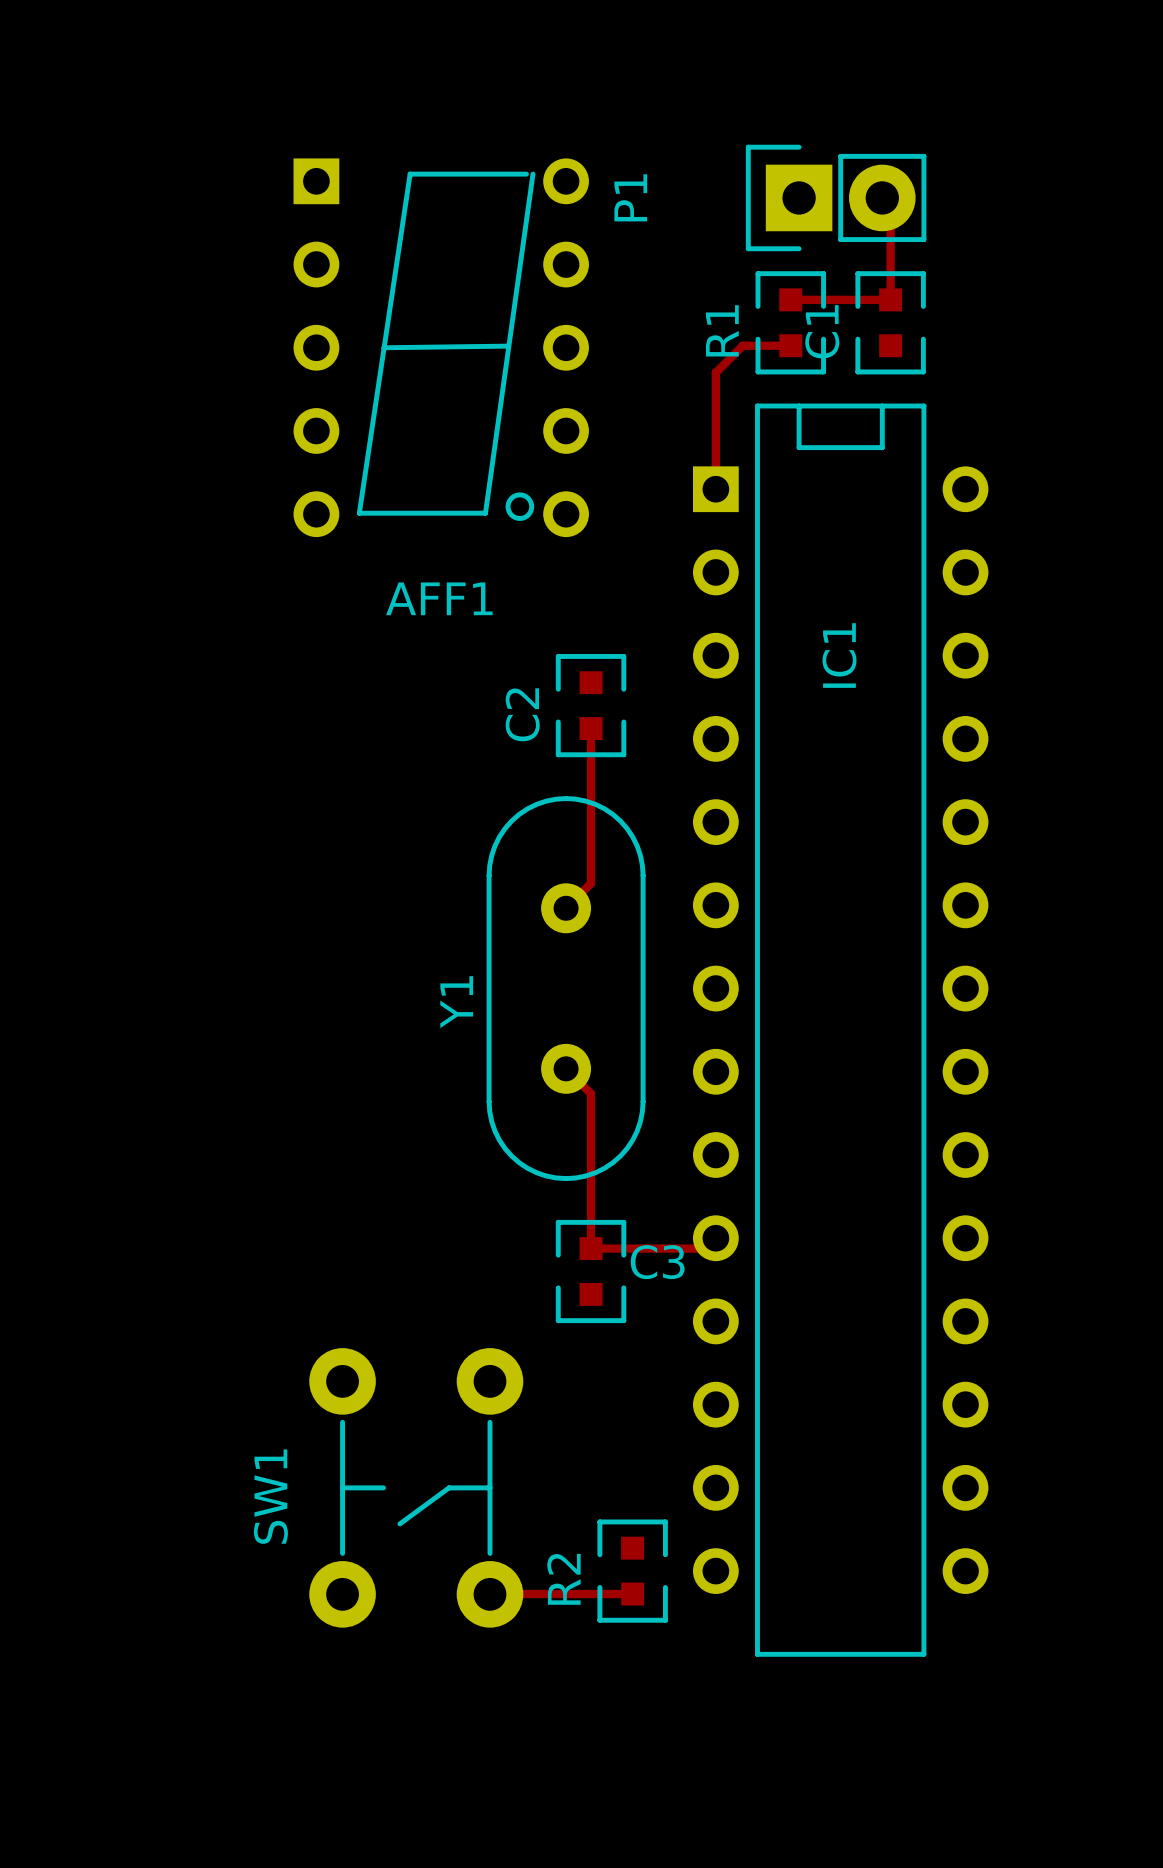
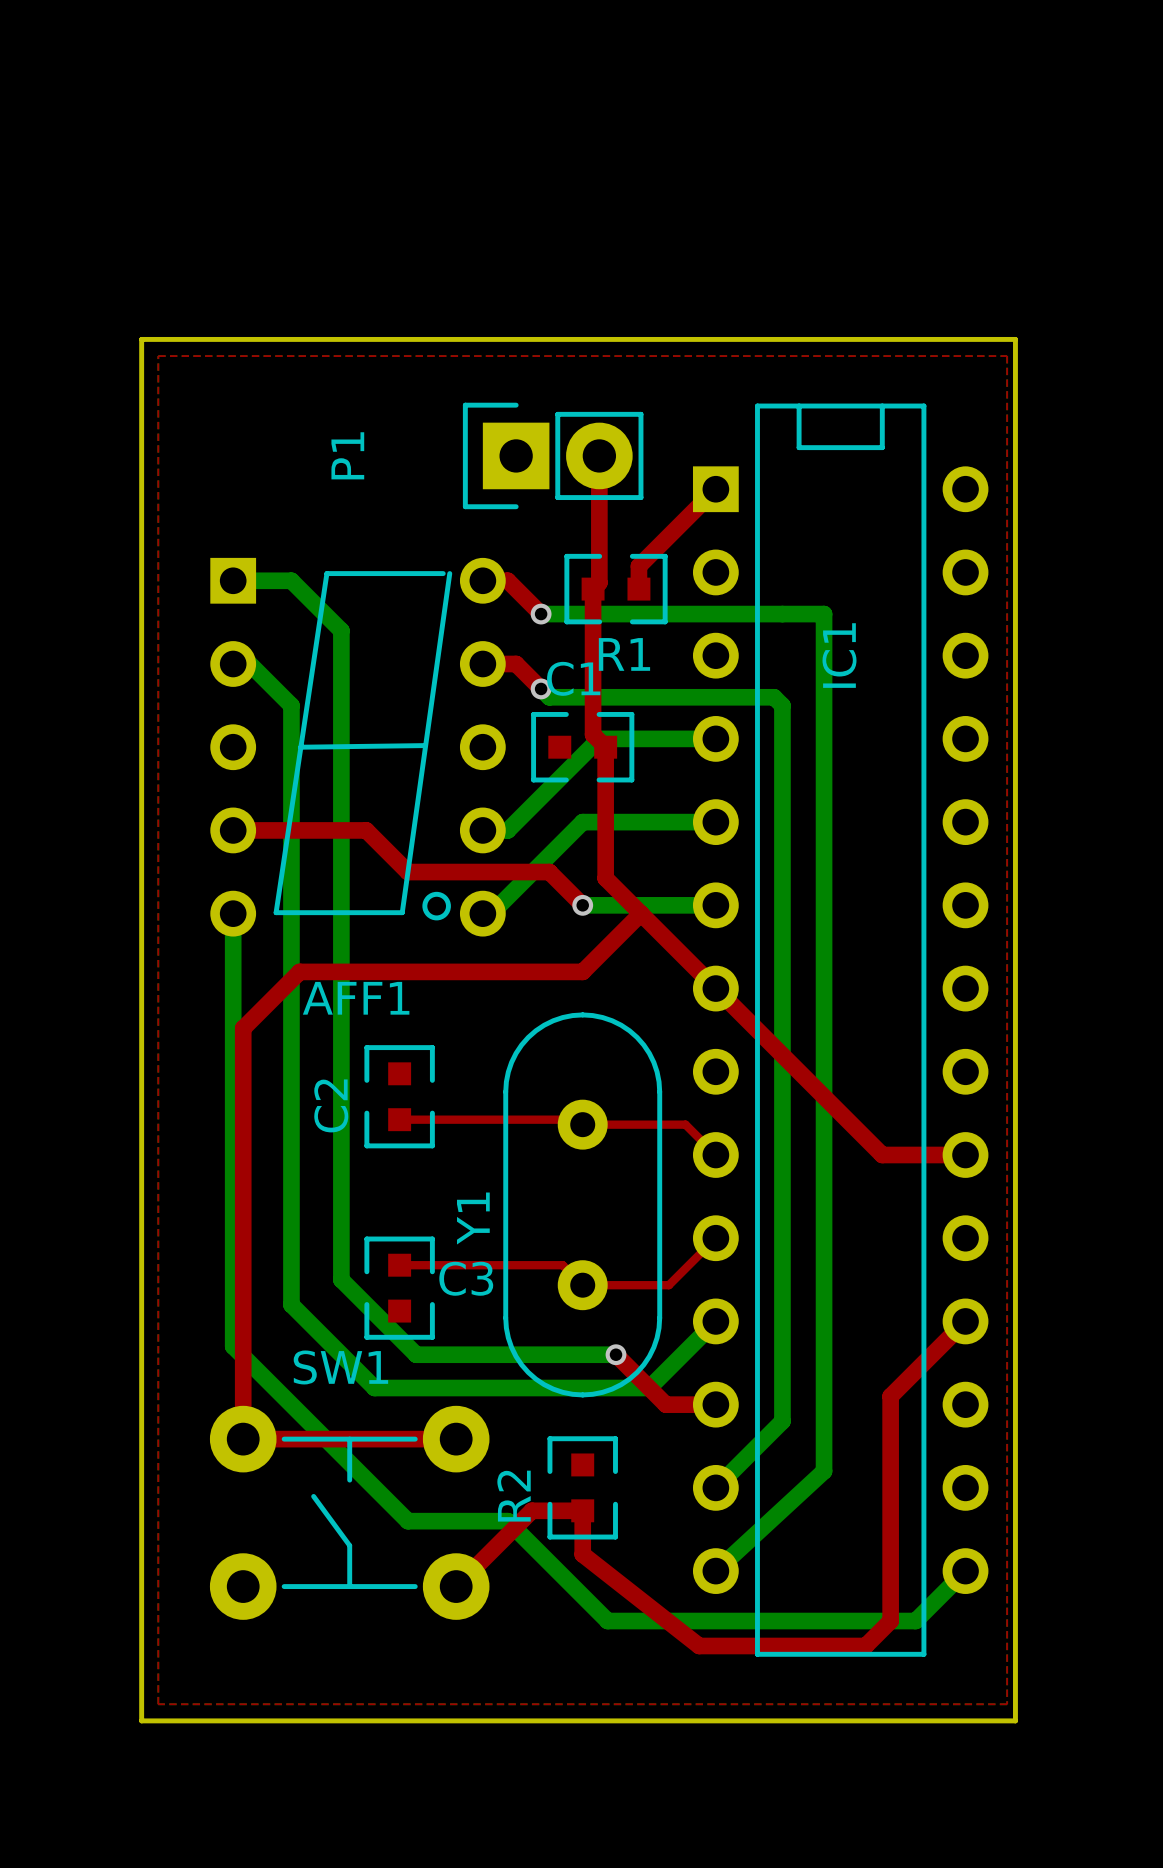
P1 position: (836, 197) -> (553, 455)
top track: (882, 197) (890, 206) (890, 299) (790, 299) -> none
R1 rotation: 0° (790, 322) -> 90° clockwise (616, 589)
R1 position: (790, 322) -> (616, 589)
C1 rotation: 0° (890, 322) -> 90° clockwise (582, 747)
C1 position: (890, 322) -> (582, 747)
R1 name position: R1 (722, 330) -> R1 (624, 654)
board edge: none -> (141, 339) (1015, 339) (1015, 1720) (141, 1720) (141, 339)
top track: (790, 345) (742, 345) (715, 372) (715, 489) -> (638, 589) (638, 566) (715, 489)
AFF1 position: (441, 347) -> (358, 747)
top zone outline: none -> (158, 356) (158, 1704) (1007, 1704) (1007, 356) (158, 356)
top track: none -> (599, 455) (599, 582)
bottom track: none -> (233, 580) (291, 580) (341, 630) (341, 1279) (416, 1354) (616, 1354)
top track: none -> (482, 580) (507, 580) (541, 614)
top track: none -> (593, 589) (593, 734) (605, 747) (605, 878) (882, 1154) (965, 1154)
bottom track: none -> (541, 614) (824, 614) (824, 1471) (715, 1571)
via: none -> (541, 614)
bottom track: none -> (233, 663) (249, 663) (291, 705) (291, 1304) (374, 1388) (649, 1388) (715, 1321)
top track: none -> (482, 663) (516, 663) (541, 688)
bottom track: none -> (541, 688) (549, 697) (774, 697) (782, 705) (782, 1421) (715, 1487)
via: none -> (541, 688)
C2 position: (591, 705) -> (399, 1096)
top track: (591, 728) (591, 883) (566, 908) -> none
bottom track: none -> (715, 738) (599, 738) (507, 830) (482, 830)
bottom track: none -> (715, 822) (582, 822) (491, 913) (482, 913)
top track: none -> (233, 830) (366, 830) (407, 872) (549, 872) (582, 905)
bottom track: none -> (582, 905) (715, 905)
via: none -> (582, 905)
bottom track: none -> (233, 913) (233, 1346) (407, 1521) (507, 1521) (607, 1621) (915, 1621) (965, 1571)
top track: none -> (640, 913) (582, 971) (299, 971) (243, 1028) (243, 1439) (456, 1439)
Y1 position: (566, 988) -> (582, 1204)
top track: (566, 1068) (591, 1093) (591, 1248) (705, 1248) -> (399, 1265) (562, 1265) (582, 1285) (668, 1285) (705, 1248)
top track: none -> (399, 1119) (577, 1119) (582, 1124) (685, 1124) (715, 1154)
C3 position: (591, 1271) -> (399, 1288)
top track: none -> (965, 1321) (890, 1396) (890, 1621) (865, 1645) (699, 1645) (582, 1554) (582, 1510) (531, 1510) (456, 1586)
top track: none -> (616, 1354) (665, 1404) (715, 1404)
via: none -> (616, 1354)
SW1 rotation: 0° (416, 1487) -> 90° clockwise (349, 1512)
R2 position: (632, 1571) -> (582, 1487)
top track: (490, 1594) (632, 1594) -> none

